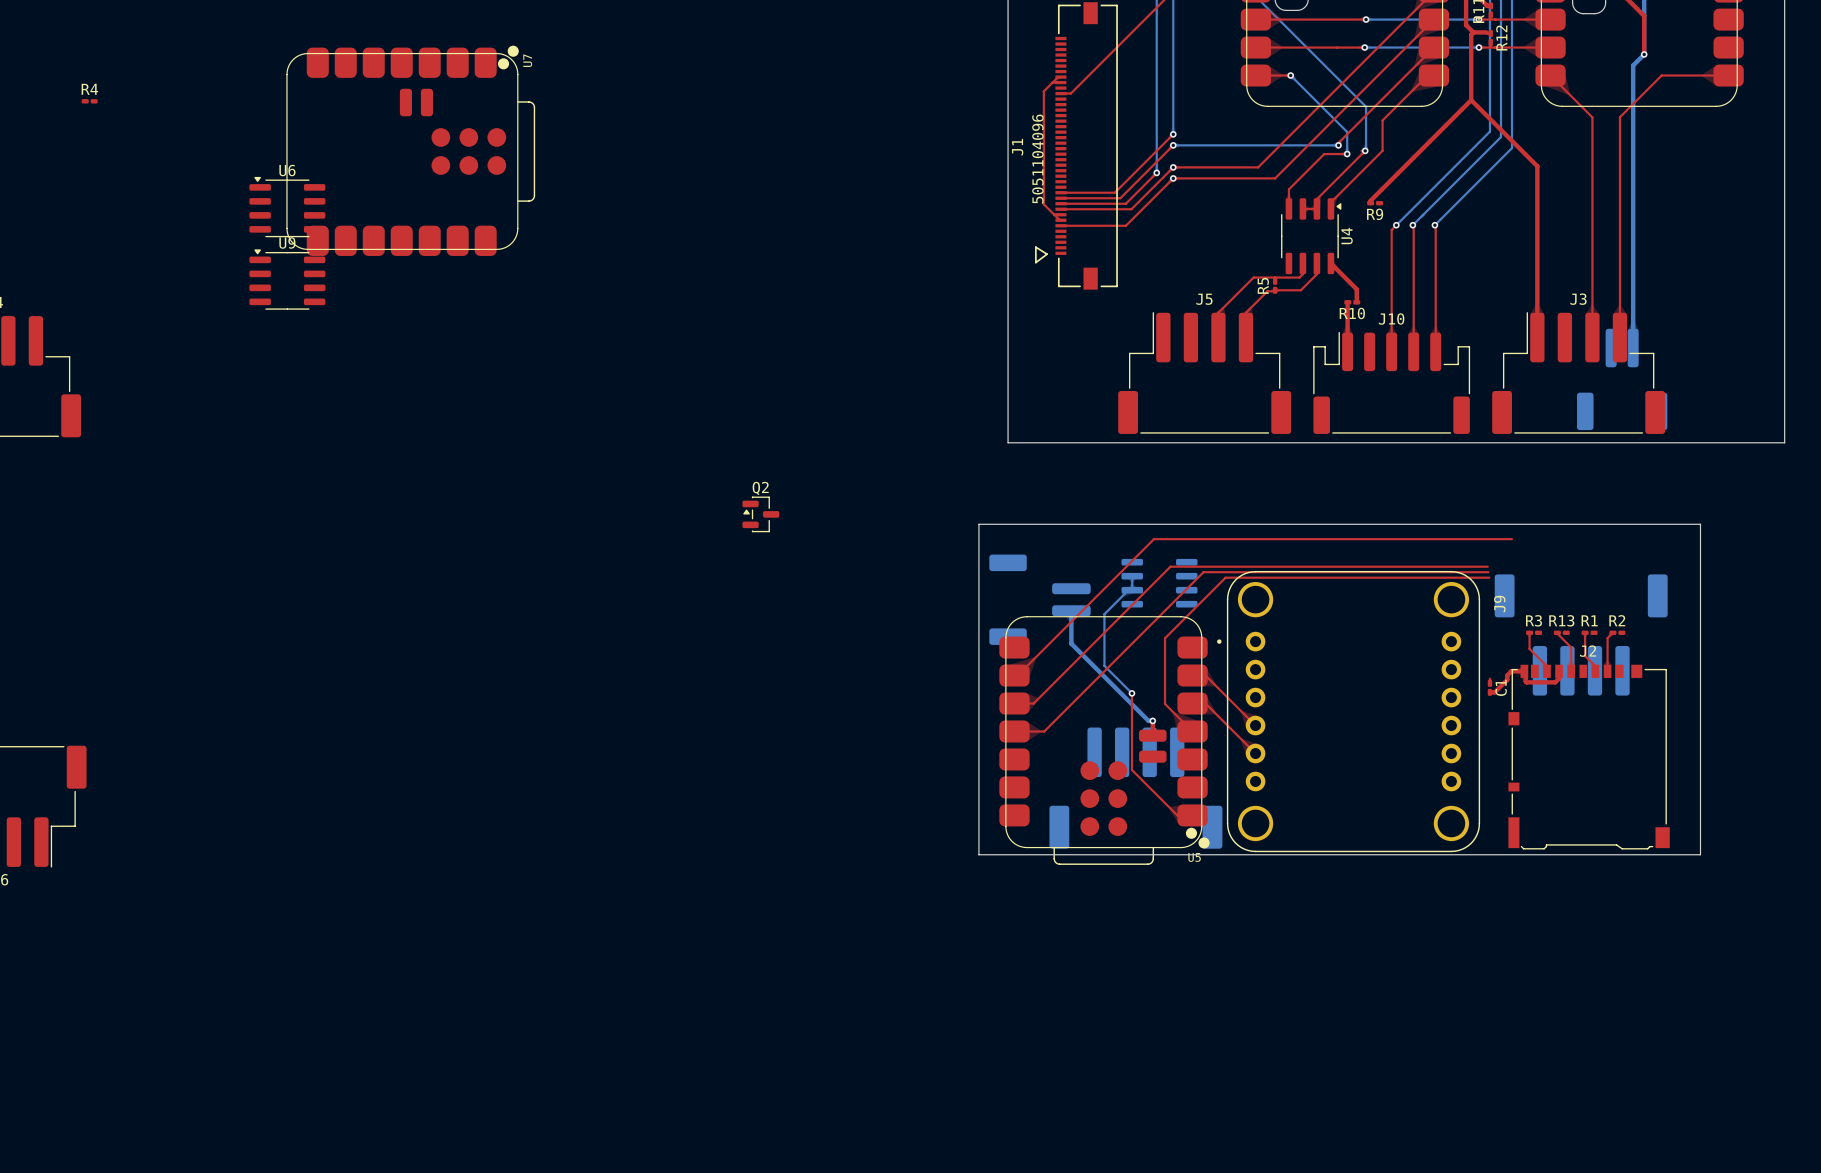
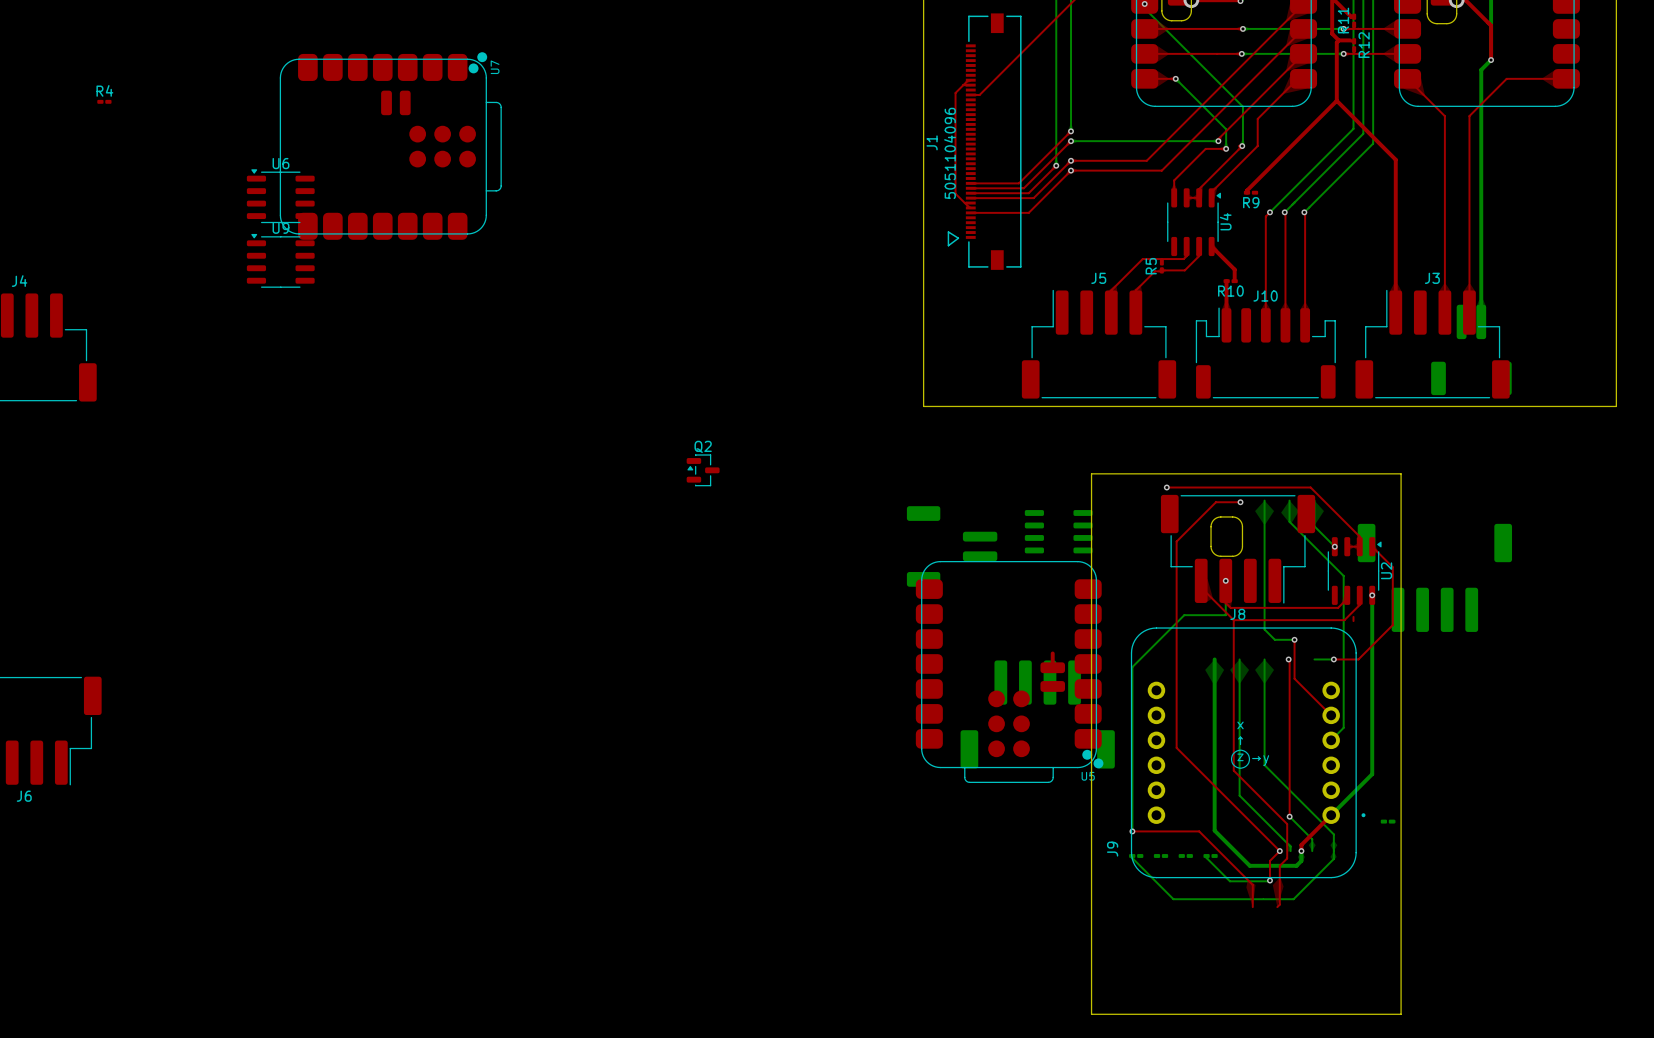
board edge: none -> (1091, 473) (1401, 473) (1401, 1014) (1091, 1014) (1091, 473)
board edge: (978, 524) (1700, 524) (1700, 854) (978, 854) (978, 524) -> none
top track: none -> (1166, 487) (1310, 487) (1359, 536) (1359, 546) (1347, 546)
via: none -> (1166, 487)
top track: (1512, 539) (1154, 539) (1017, 675) (1014, 675) -> none
bottom track: none -> (1264, 500) (1264, 629) (1274, 639) (1294, 639)
bottom track: none -> (1289, 500) (1289, 521) (1343, 575) (1343, 727) (1331, 740)
bottom track: none -> (1314, 500) (1314, 526) (1334, 546)
top track: none -> (1240, 502) (1215, 502) (1176, 541) (1176, 747) (1279, 851) (1269, 860) (1269, 880)
via: none -> (1240, 502)
board edge: none -> (1220, 516) (1235, 517) (1241, 523) (1242, 548) (1235, 555) (1218, 556) (1211, 549) (1211, 524) (1214, 519) (1220, 516)
top track: (1487, 566) (1170, 566) (1033, 703) (1014, 703) -> none
J9 footprint: [1217, 570, 1481, 853] -> [1130, 627, 1366, 879]
top track: (1488, 572) (1203, 572) (1044, 731) (1014, 731) -> none
bottom track: (1132, 576) (1132, 590) (1128, 590) (1104, 614) (1104, 665) (1131, 693) -> none
top track: (1489, 577) (1225, 577) (1165, 638) (1165, 703) (1192, 731) -> none
via: none -> (1334, 546)
top track: none -> (1372, 546) (1392, 567) (1392, 625) (1358, 659) (1333, 659)
J8: none -> (1238, 549)
J9 name position: J9 (1499, 603) -> J9 (1112, 849)
bottom track: (1071, 610) (1071, 643) (1148, 720) (1152, 720) -> none
U2: none -> (1354, 571)
top track: (1529, 632) (1529, 648) (1546, 666) (1546, 671) -> none
R3: (1534, 632) -> none
top track: (1557, 632) (1571, 647) (1571, 671) -> none
R13: (1561, 632) -> none
top track: (1585, 632) (1585, 656) (1595, 666) (1595, 671) -> none
R1: (1589, 632) -> none
top track: (1612, 632) (1607, 638) (1607, 671) -> none
R2: (1617, 632) -> none
top track: none -> (1201, 580) (1201, 587) (1233, 620)
top track: none -> (1225, 580) (1225, 602) (1230, 607) (1338, 607) (1347, 598) (1347, 595)
bottom track: none -> (1225, 580) (1225, 615) (1184, 615) (1132, 667) (1132, 831)
via: none -> (1225, 580)
top track: none -> (1359, 595) (1359, 604) (1344, 620) (1233, 620)
bottom track: none -> (1372, 595) (1372, 774) (1331, 815)
via: none -> (1372, 595)
top track: (1559, 671) (1559, 678) (1555, 682) (1526, 682) (1524, 671) (1511, 671) (1507, 675) (1507, 679) (1494, 692) (1489, 692) -> none
top track: (1192, 675) (1205, 675) (1255, 725) -> none
top track: none -> (1233, 620) (1233, 770) (1287, 824) (1287, 858) (1279, 865) (1279, 904) (1277, 907)
C1 side: top (1489, 687) -> bottom (1387, 821)
top track: (1131, 693) (1131, 769) (1177, 815) (1192, 815) -> none
via: (1131, 693) -> none
top track: (1192, 703) (1205, 703) (1255, 753) -> none
top track: none -> (1294, 639) (1294, 678) (1331, 715)
via: none -> (1294, 639)
via: (1152, 720) -> none
bottom track: none -> (1214, 659) (1214, 830) (1249, 865) (1296, 865) (1301, 860) (1301, 851)
bottom track: none -> (1239, 659) (1239, 795) (1290, 846) (1290, 851)
bottom track: none -> (1264, 659) (1264, 765) (1333, 834) (1333, 858) (1293, 899) (1263, 899)
top track: none -> (1288, 659) (1289, 816)
via: none -> (1288, 659)
bottom track: none -> (1314, 659) (1333, 659)
via: none -> (1333, 659)
J2: (1589, 757) -> none
text: none -> x (1240, 725)
text: none -> ↑ (1240, 740)
text: none -> z (1240, 757)
text: none -> ◯ (1240, 759)
text: none -> →y (1260, 760)
top track: none -> (1331, 815) (1301, 844) (1301, 851)
bottom track: none -> (1289, 816) (1312, 839) (1312, 851)
via: none -> (1289, 816)
top track: none -> (1132, 831) (1199, 831) (1252, 884) (1252, 907)
via: none -> (1132, 831)
via: none -> (1279, 851)
via: none -> (1301, 851)
bottom track: none -> (1132, 855) (1173, 899) (1263, 899)
part: none -> (1136, 855)
part: none -> (1161, 855)
part: none -> (1185, 855)
bottom track: none -> (1206, 855) (1229, 881) (1269, 881)
part: none -> (1210, 855)
via: none -> (1269, 880)

